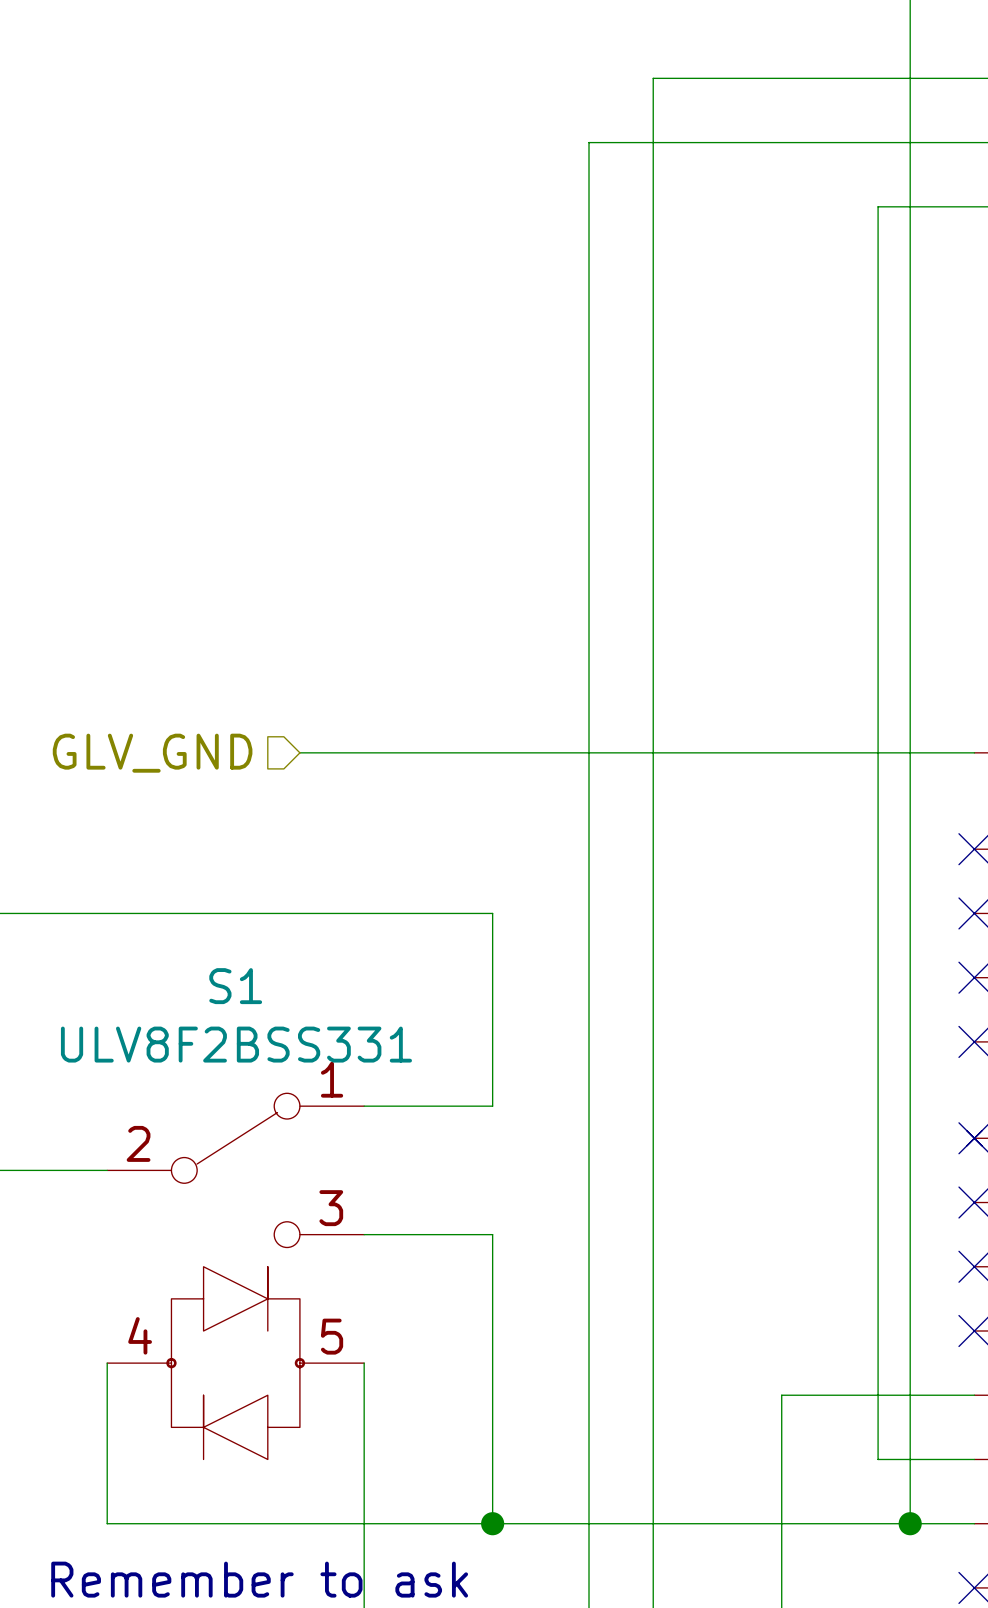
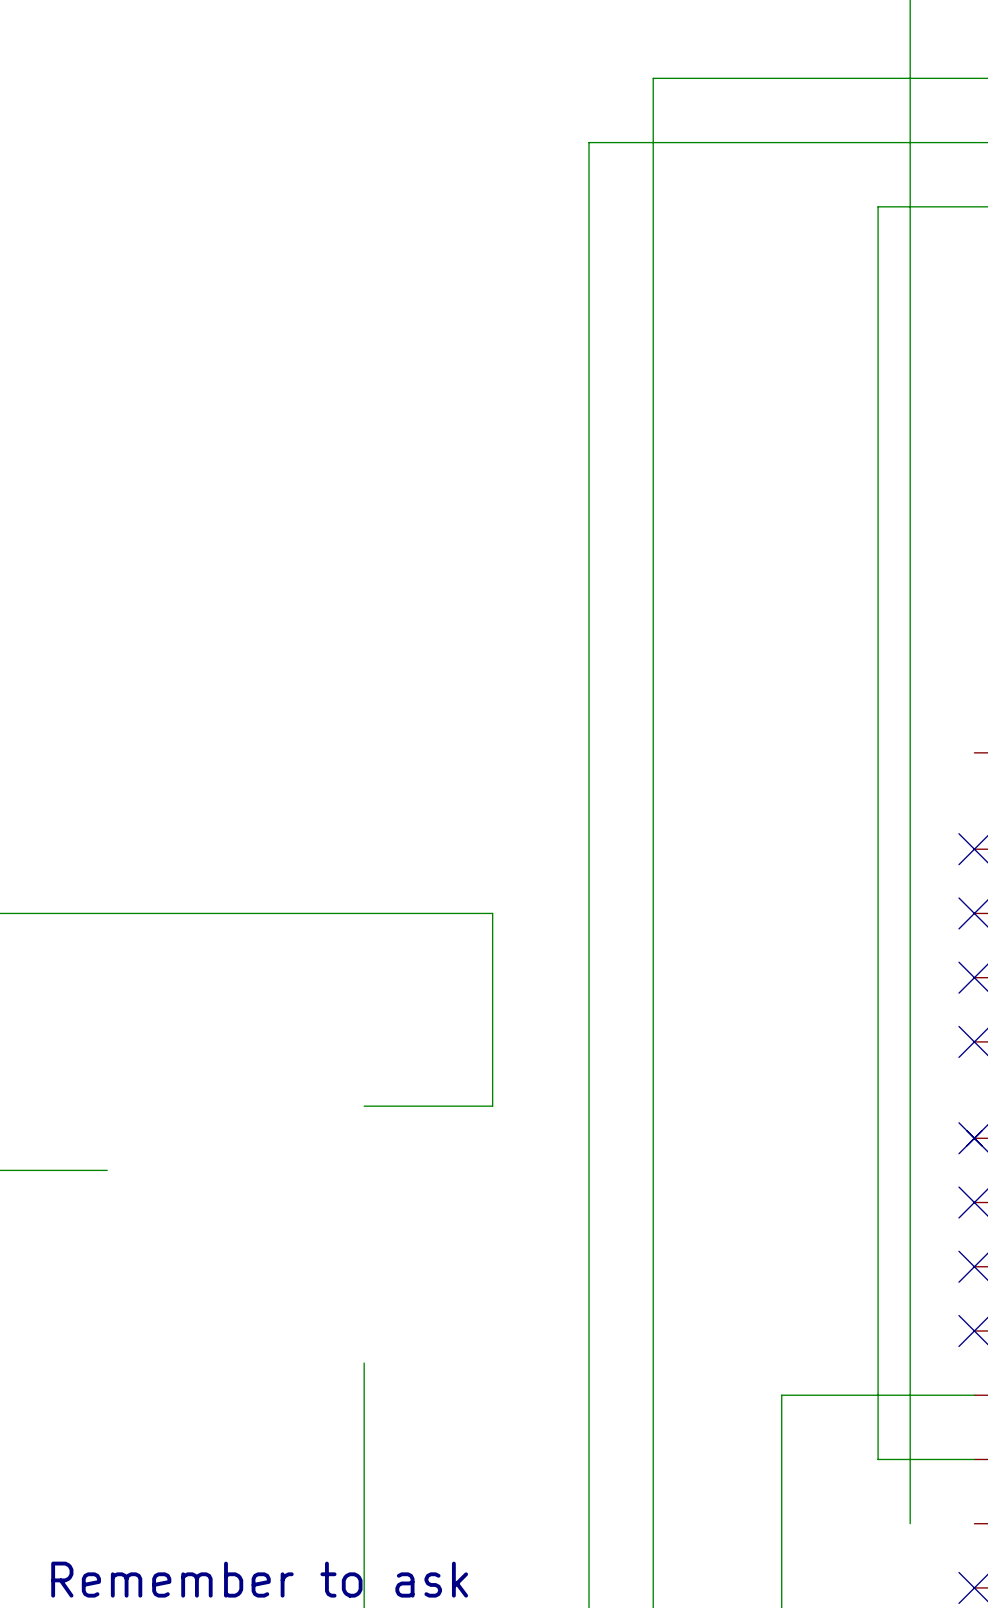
wire: (299, 752) (974, 752) -> none
hierarchical label: GLV_GND (152, 753) -> none
wire: (364, 1234) (492, 1234) (492, 1523) -> none
S1: ULV8F2BSS331 (235, 1276) -> none
wire: (107, 1363) (107, 1523) (974, 1523) -> none
junction: (492, 1523) -> none
junction: (910, 1523) -> none

